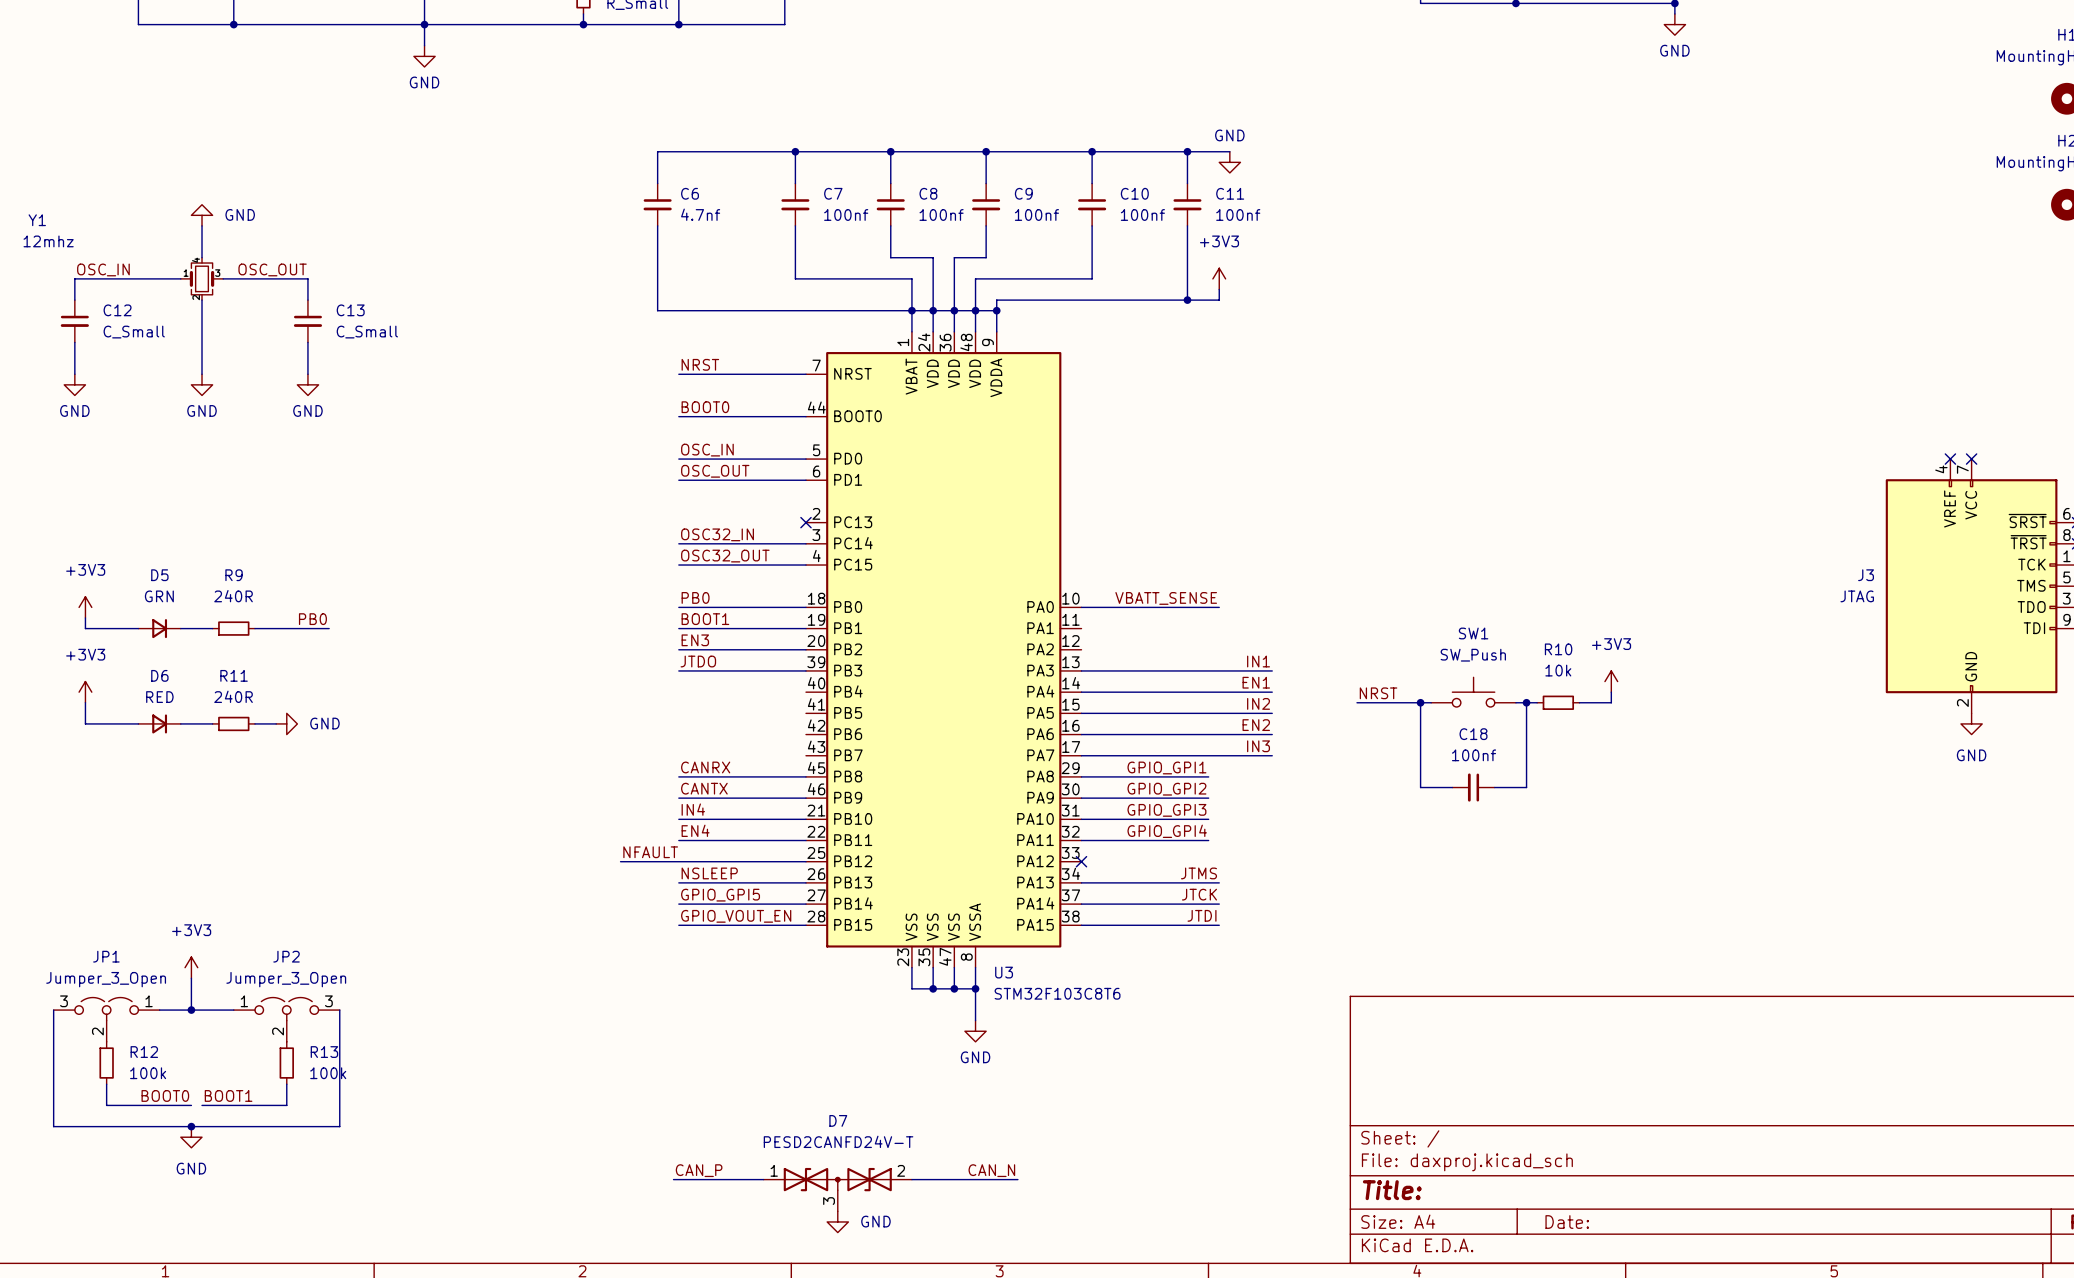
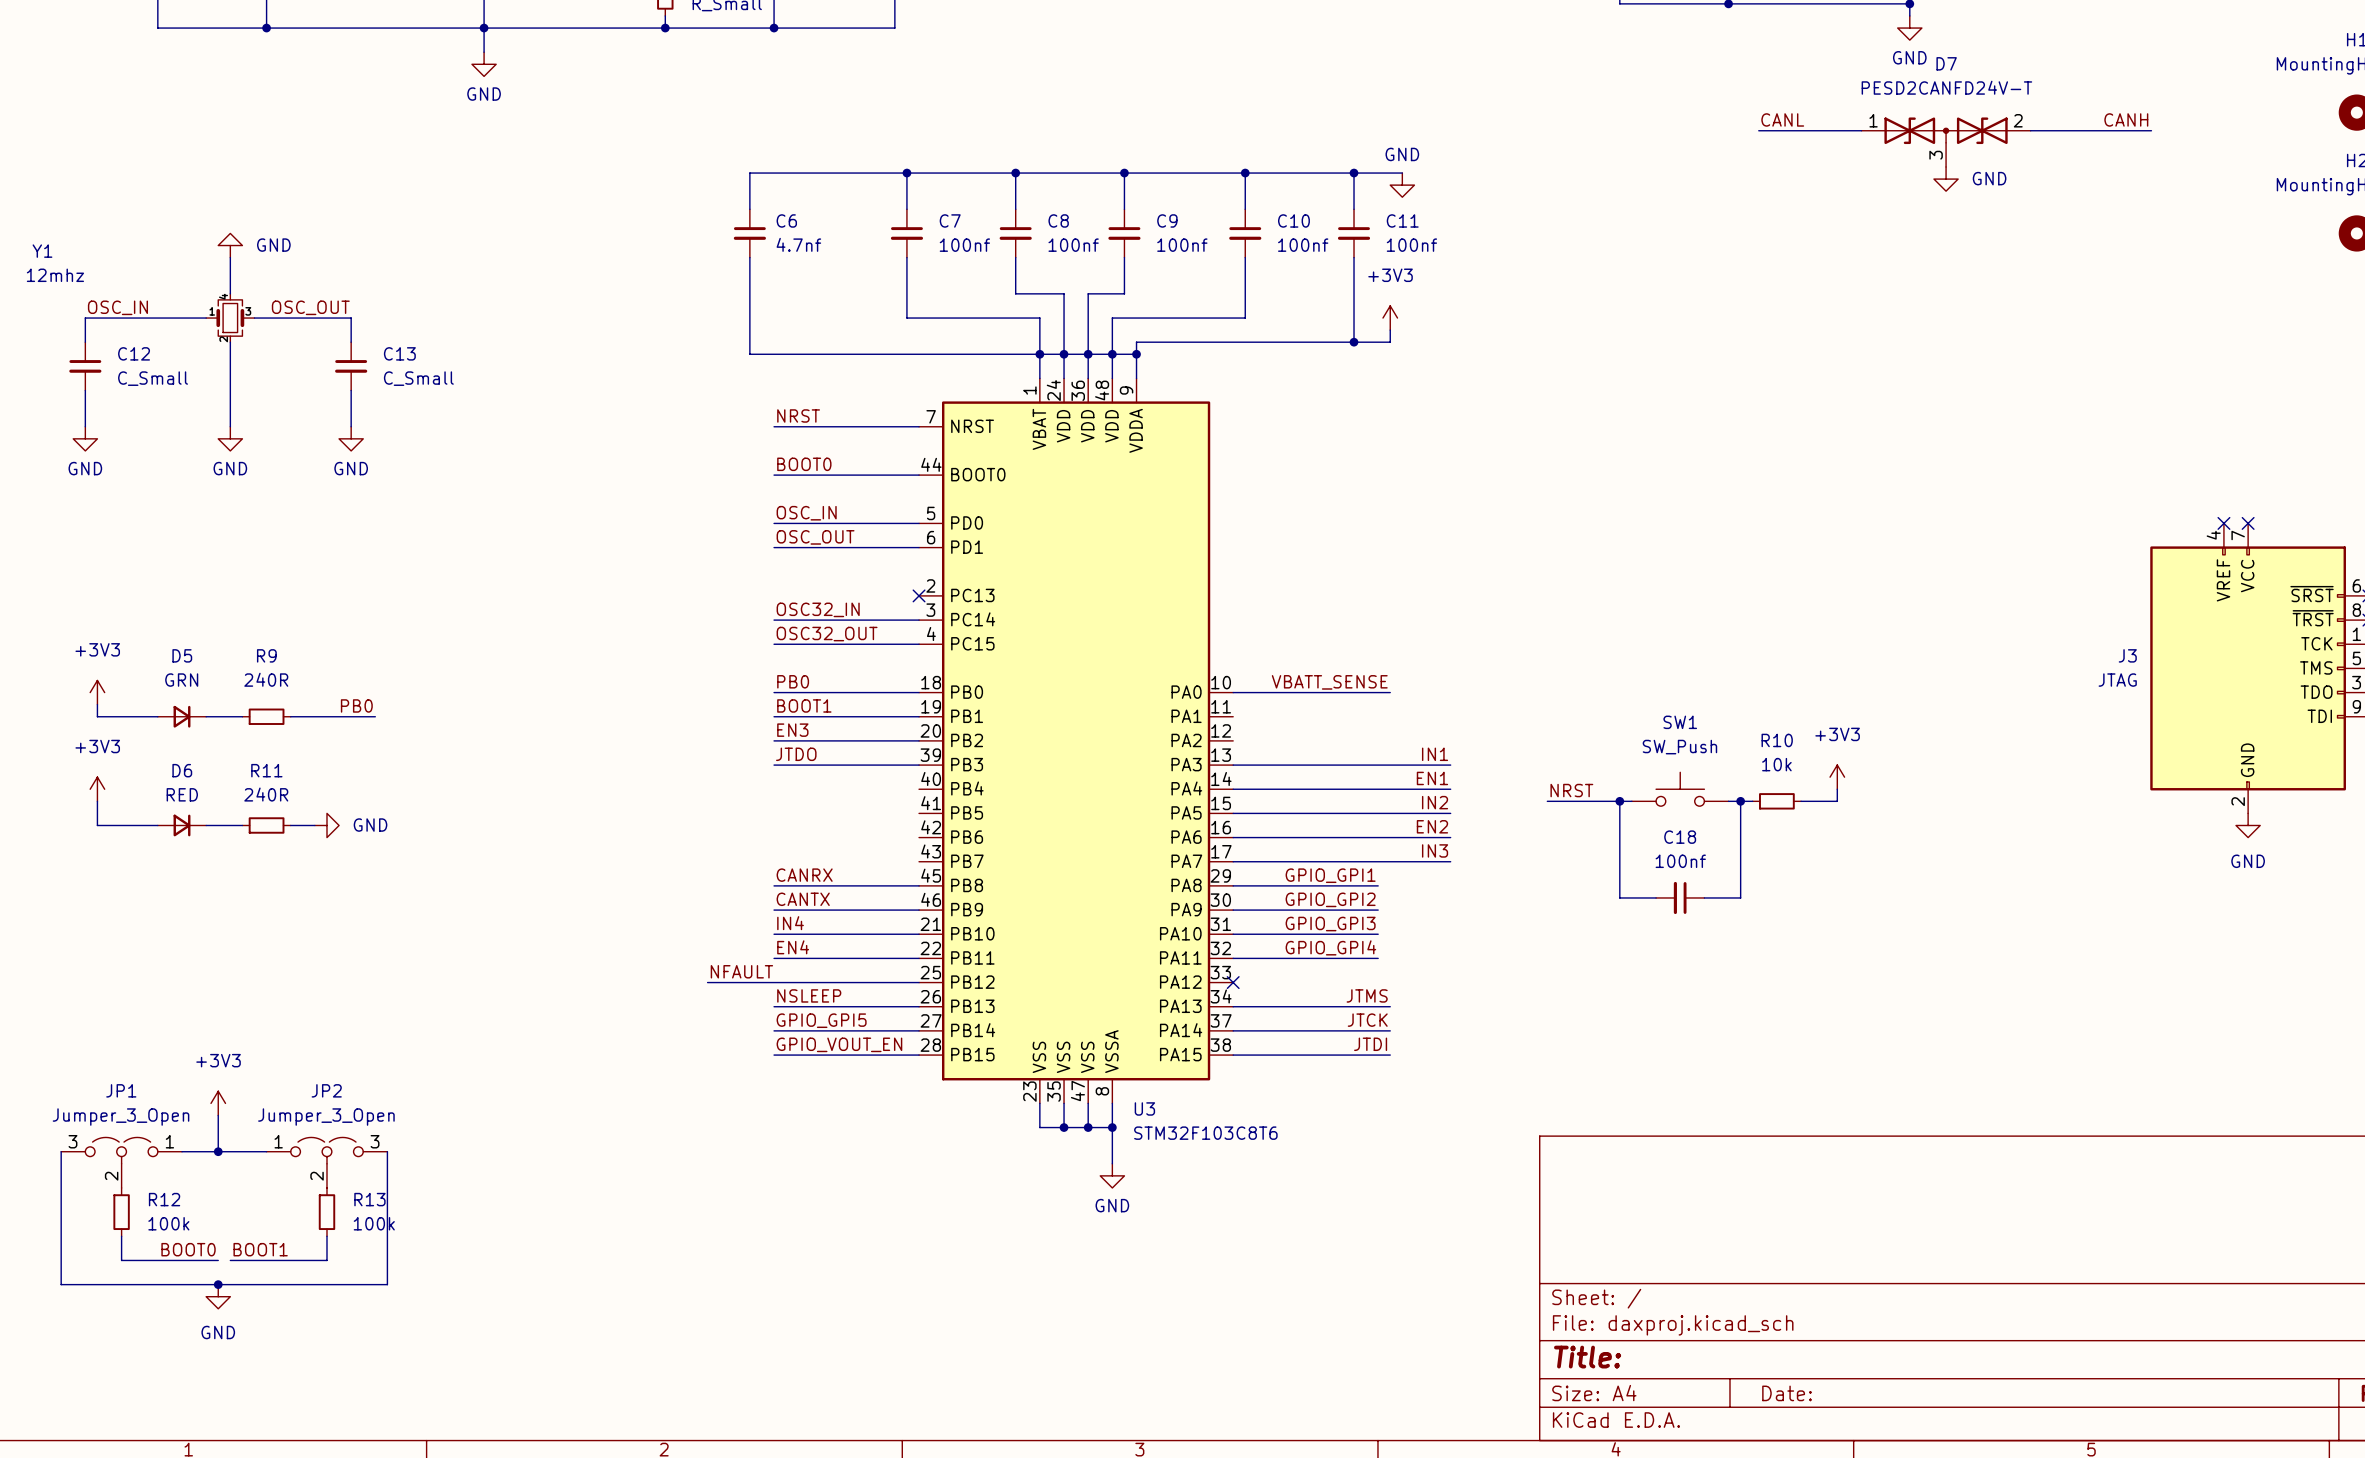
label: none -> CANL (1782, 119)
label: none -> CANH (2126, 119)
wire: none -> (1758, 130) (1861, 130)
wire: none -> (2030, 130) (2151, 130)
power symbol: none -> GND (1946, 179)
label: CAN_P (699, 1170) -> none
label: CAN_N (991, 1170) -> none
wire: (673, 1179) (763, 1179) -> none
wire: (911, 1179) (1017, 1179) -> none
D7 position: (837, 1189) -> (1946, 142)
power symbol: GND (837, 1221) -> none

